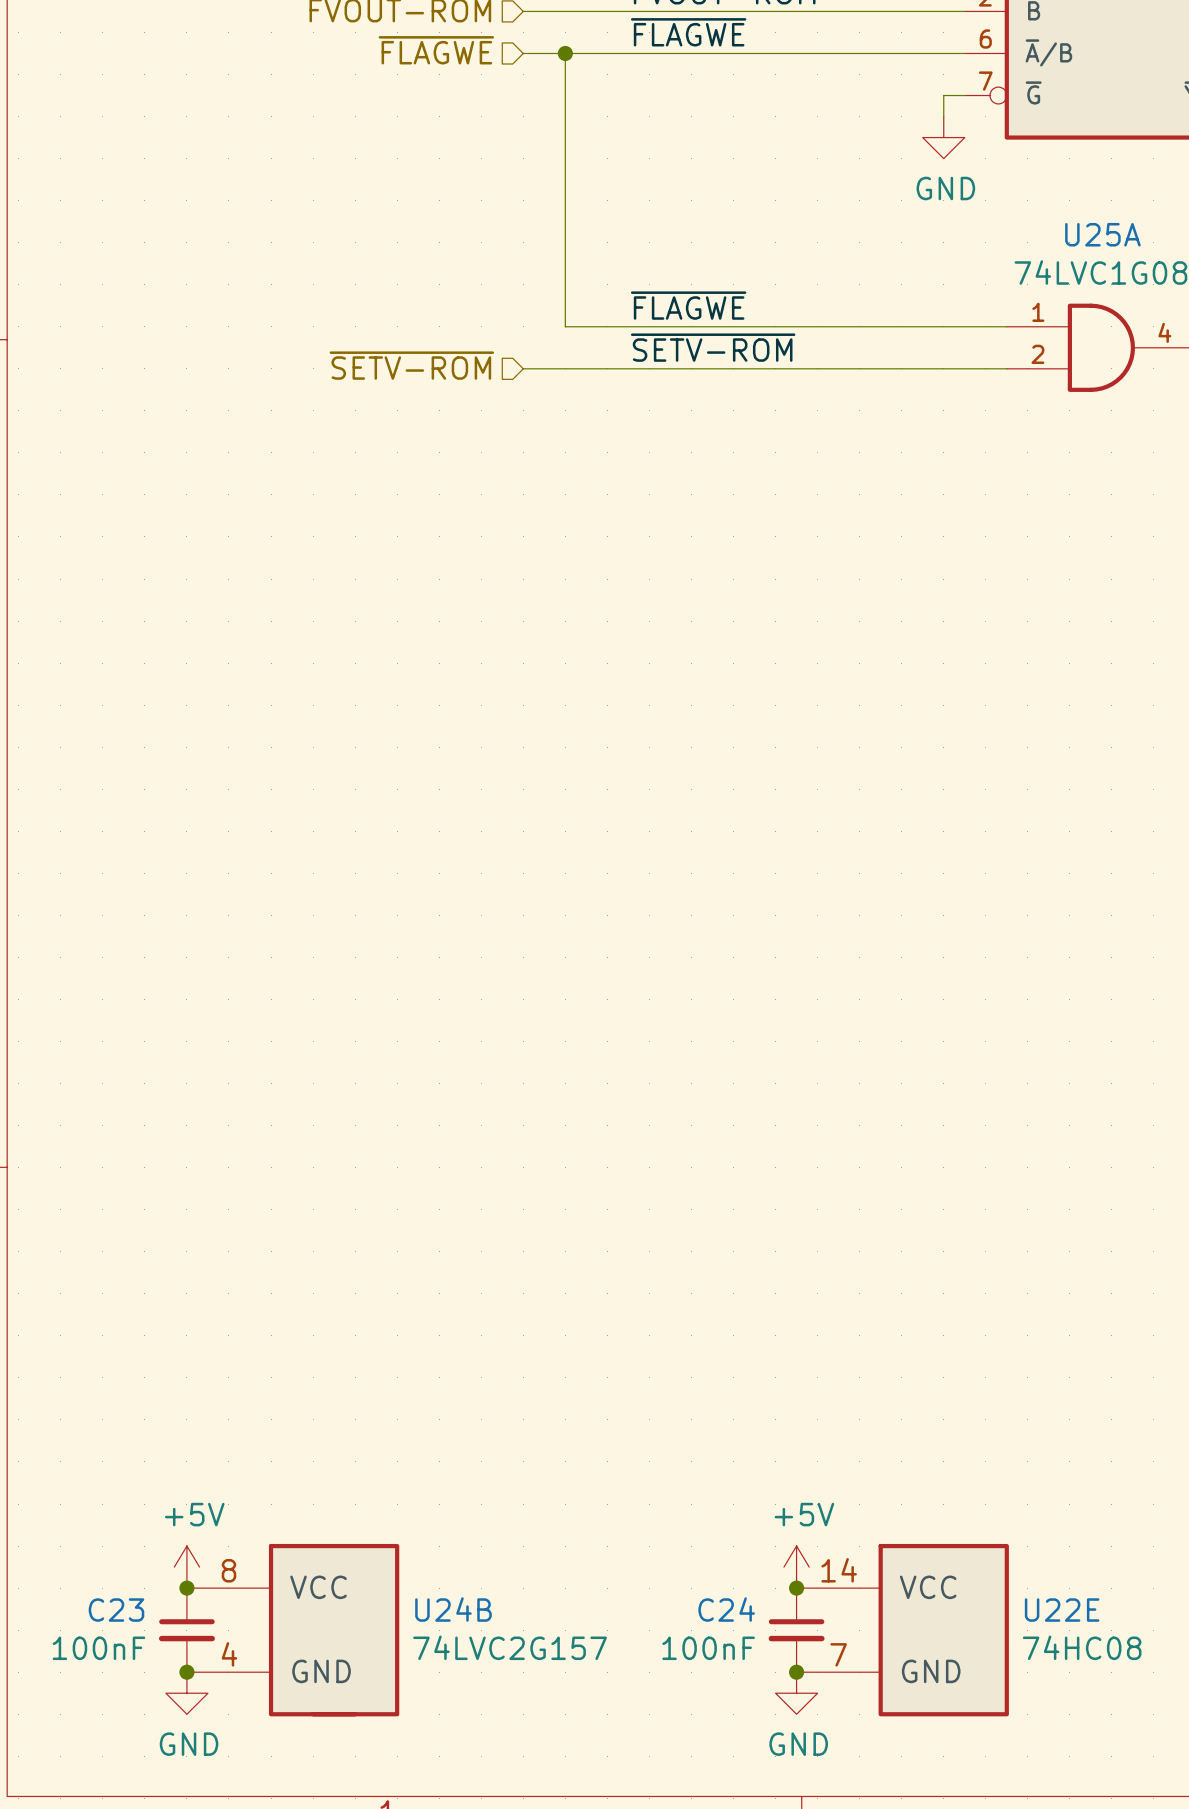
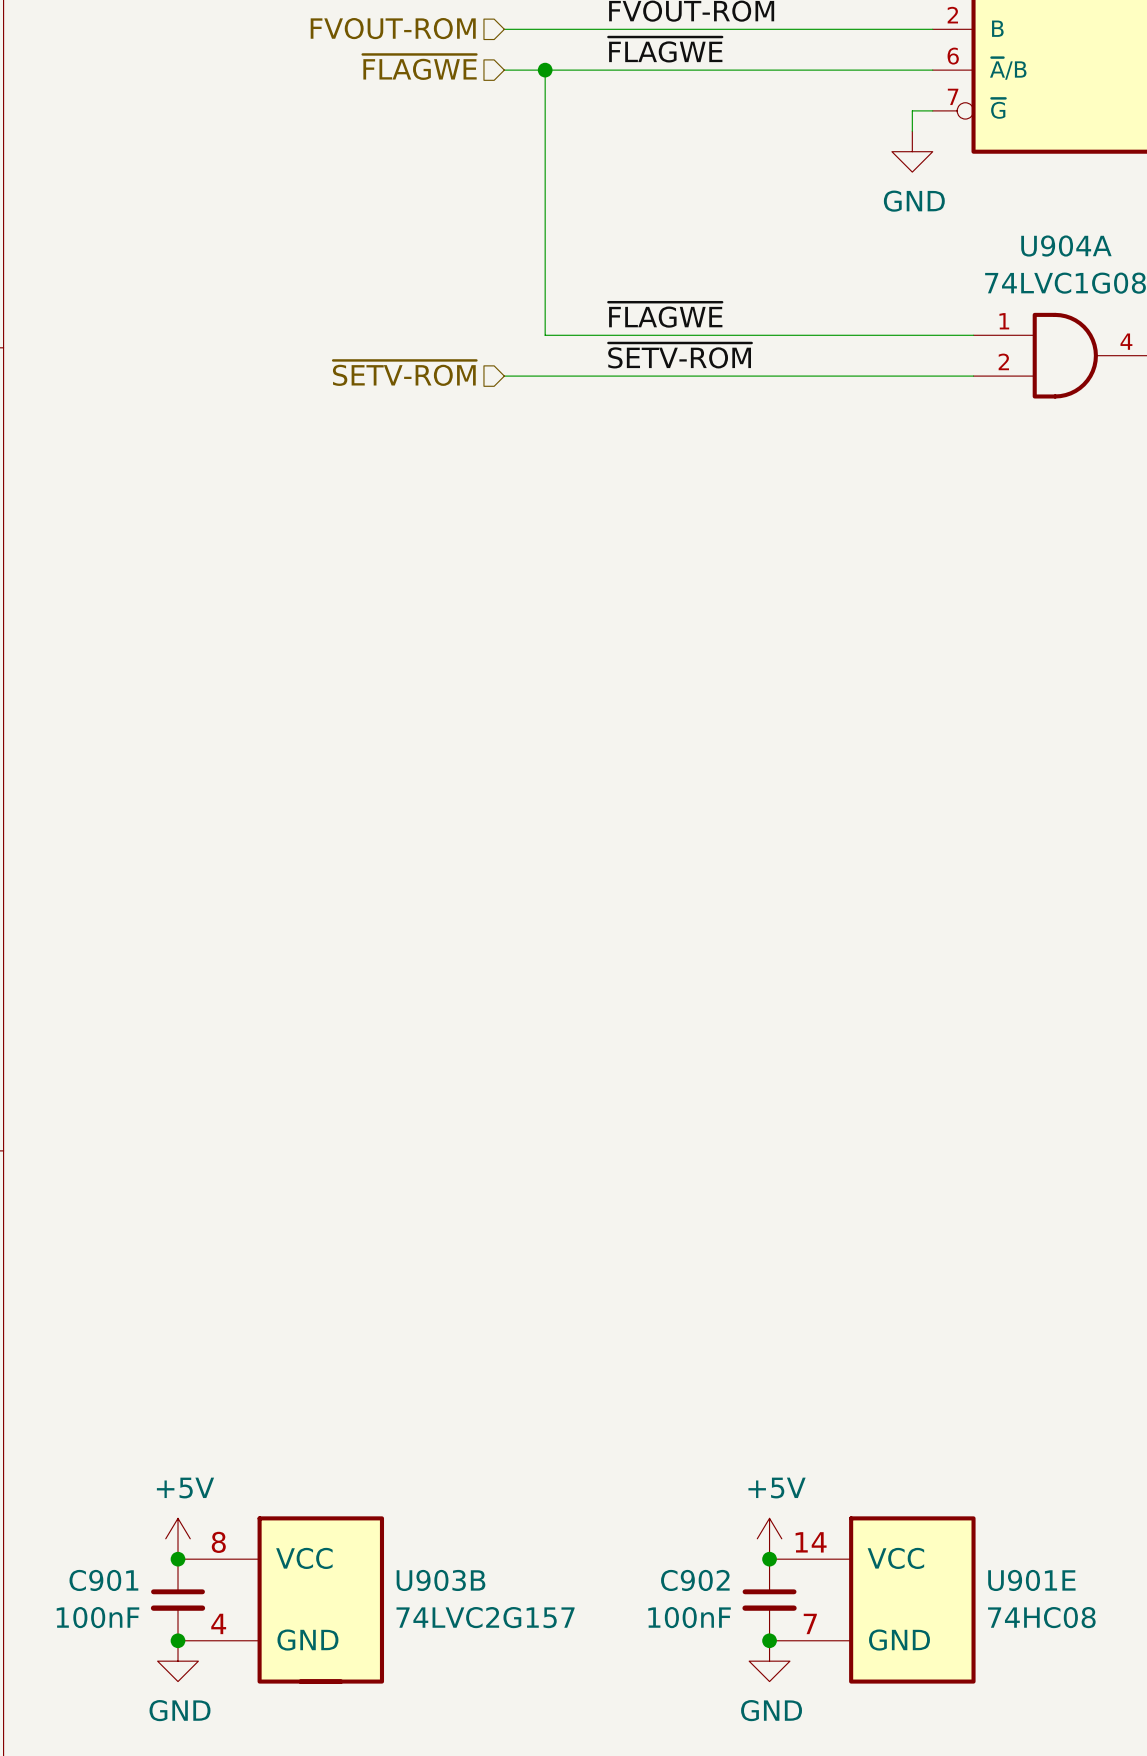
U25A name: U25A (1102, 234) -> U904A (1066, 246)
U24B name: U24B (453, 1609) -> U903B (440, 1580)
C24 name: C24 (726, 1609) -> C902 (695, 1580)
C23 name: C23 (116, 1610) -> C901 (103, 1580)
U22E name: U22E (1062, 1610) -> U901E (1031, 1580)

